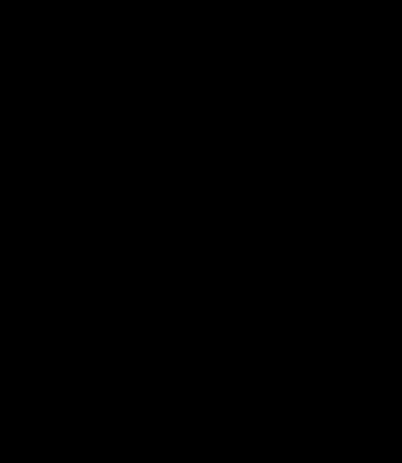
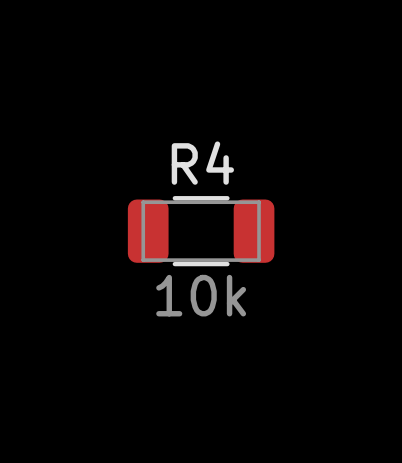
R4: none -> 10k (201, 231)

